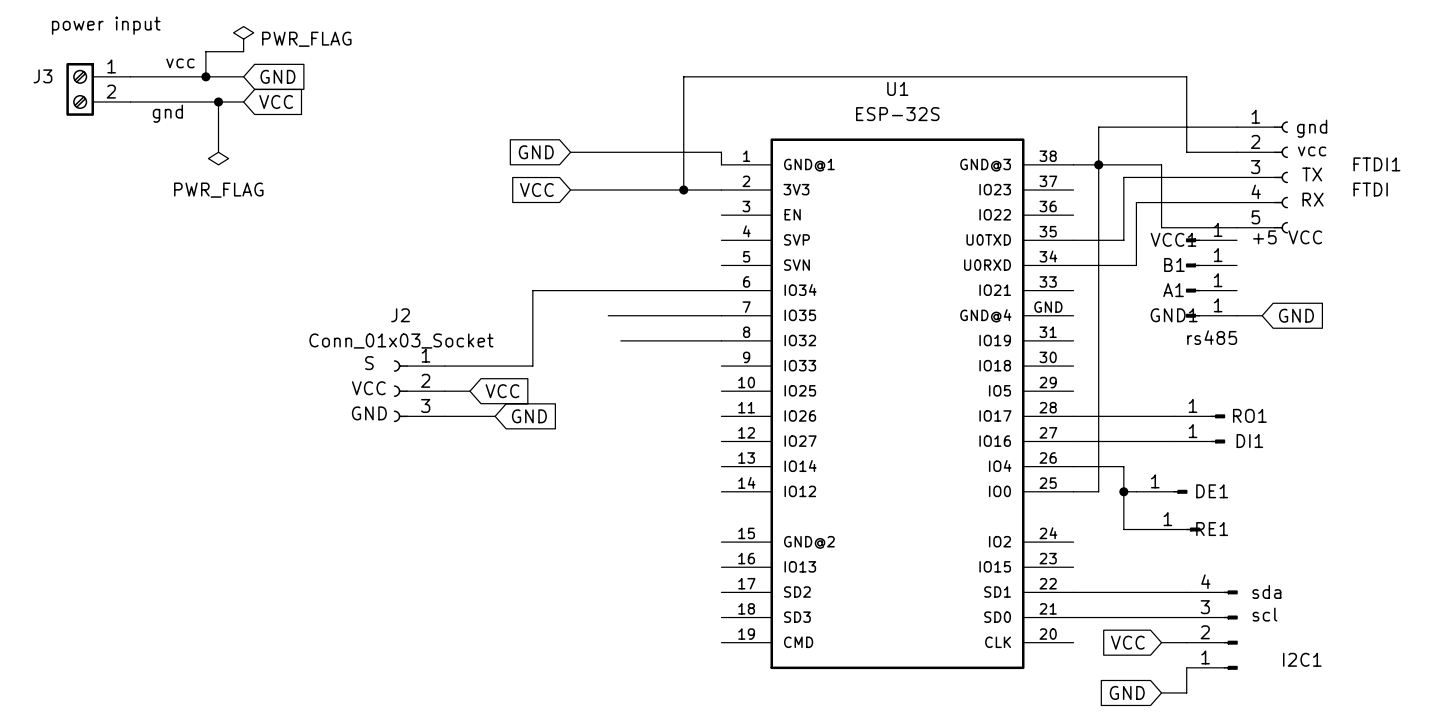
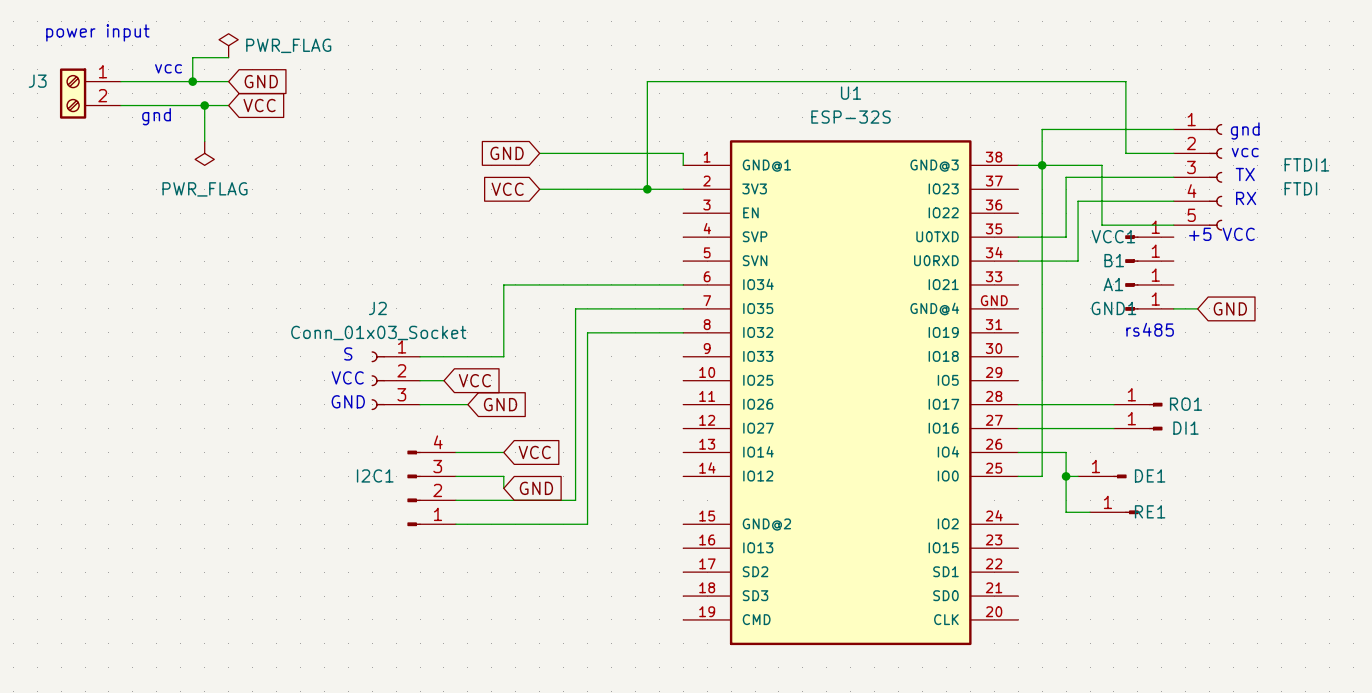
wire: none -> (575, 308) (575, 500) (455, 500)
wire: none -> (587, 332) (587, 524) (455, 524)
wire: none -> (455, 452) (503, 452)
global label: none -> VCC (534, 452)
wire: none -> (455, 476) (503, 476) (503, 488)
global label: none -> GND (536, 488)
text: sda (1266, 591) -> none
wire: (1073, 592) (1186, 592) -> none
text: scl (1264, 614) -> none
wire: (1073, 617) (1186, 617) -> none
I2C1 position: (1212, 630) -> (431, 488)
I2C1 flip: as is (1230, 630) -> left-right (414, 488)
global label: VCC (1127, 642) -> none
wire: (1161, 642) (1186, 642) -> none
I2C1 name position: I2C1 (1302, 659) -> I2C1 (375, 475)
wire: (1186, 667) (1186, 692) (1161, 692) -> none
global label: GND (1127, 692) -> none

